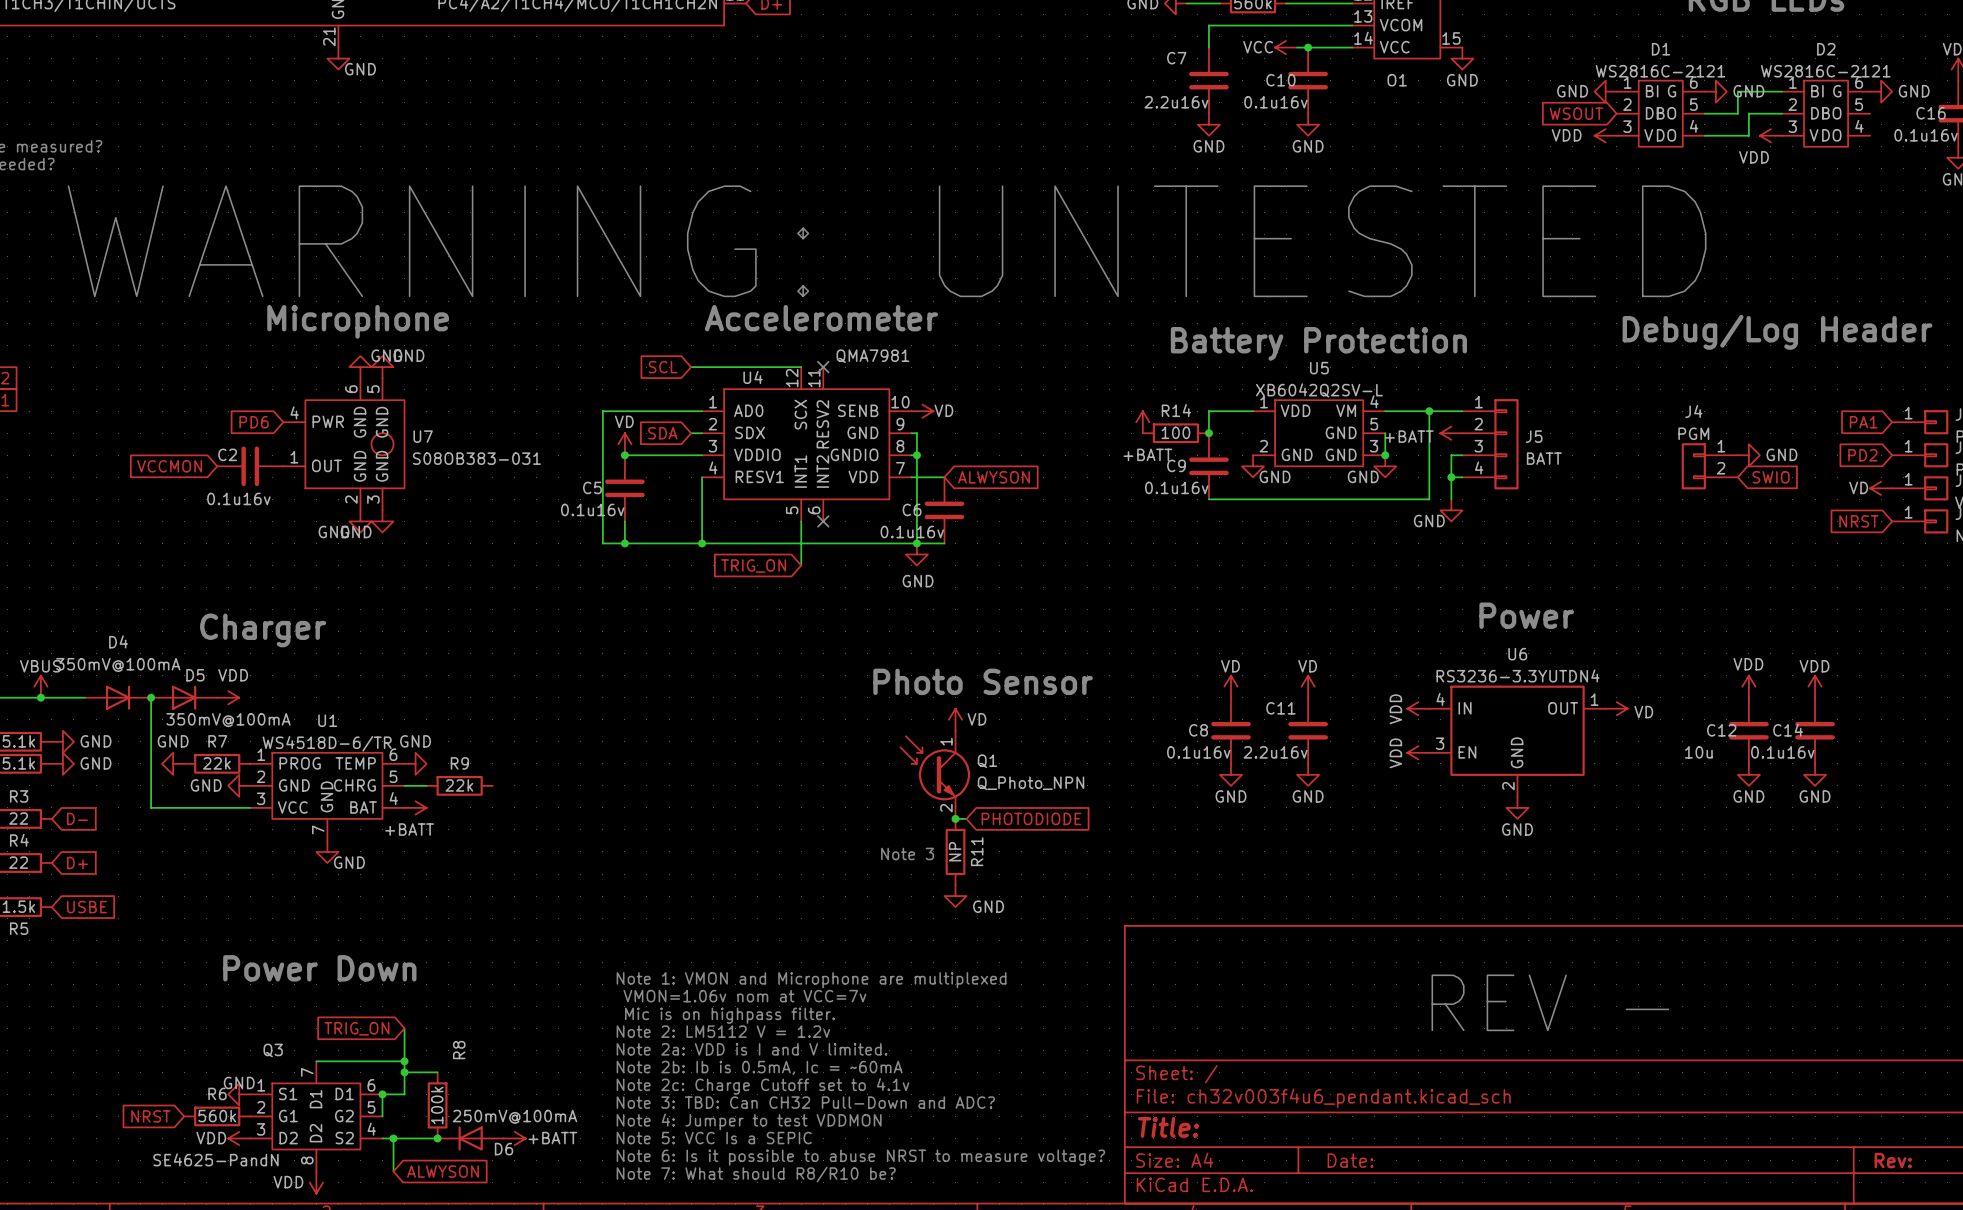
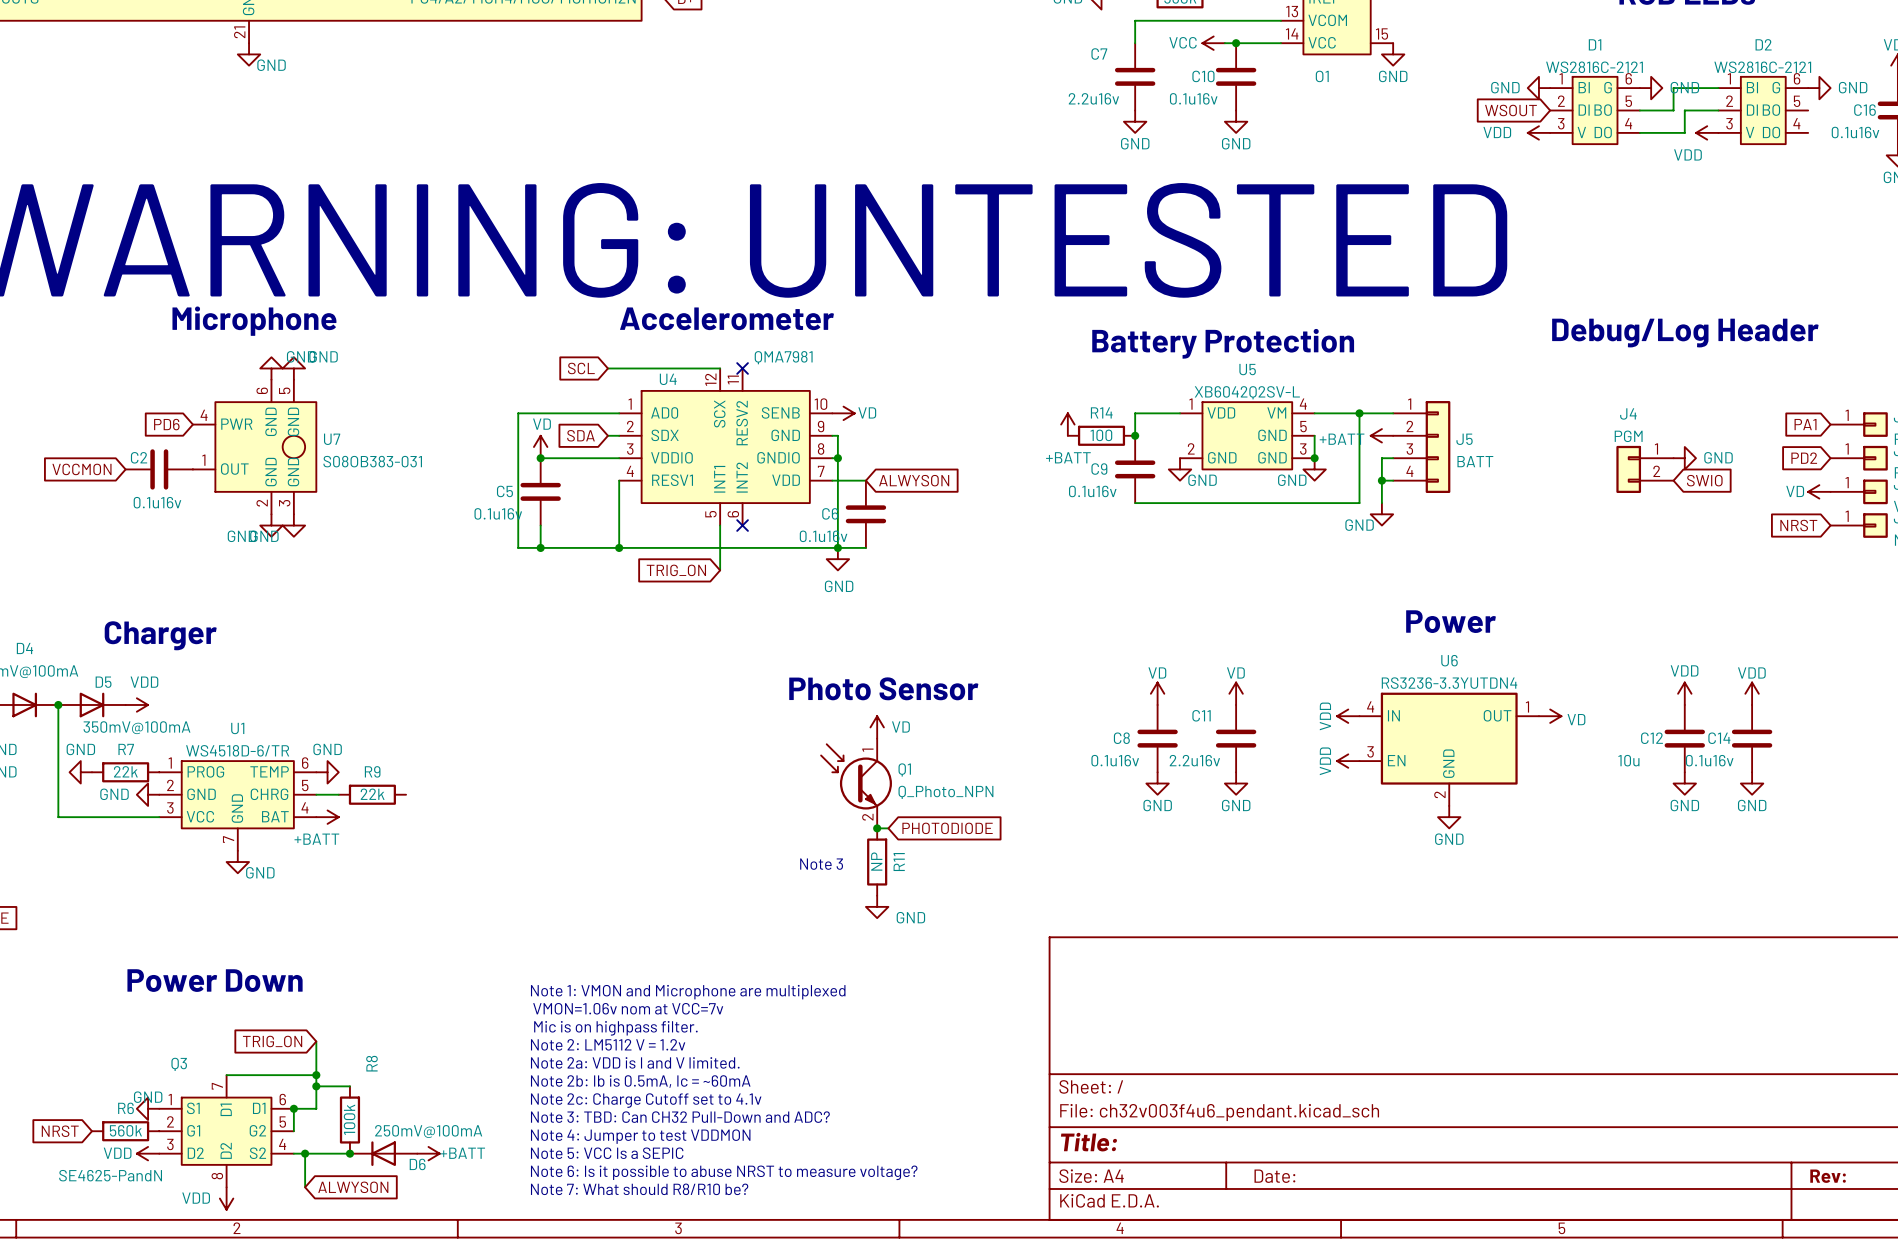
text: REV - (1550, 1002) -> none

